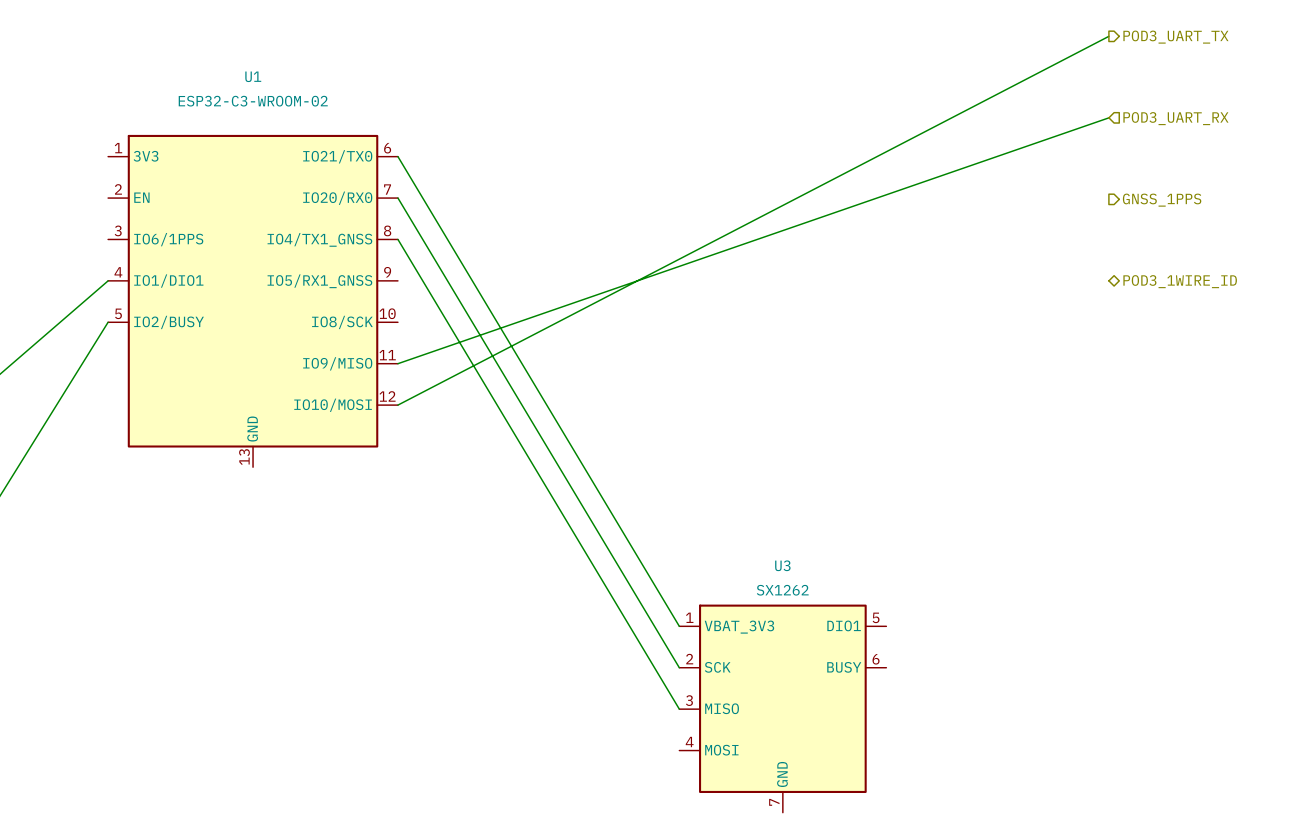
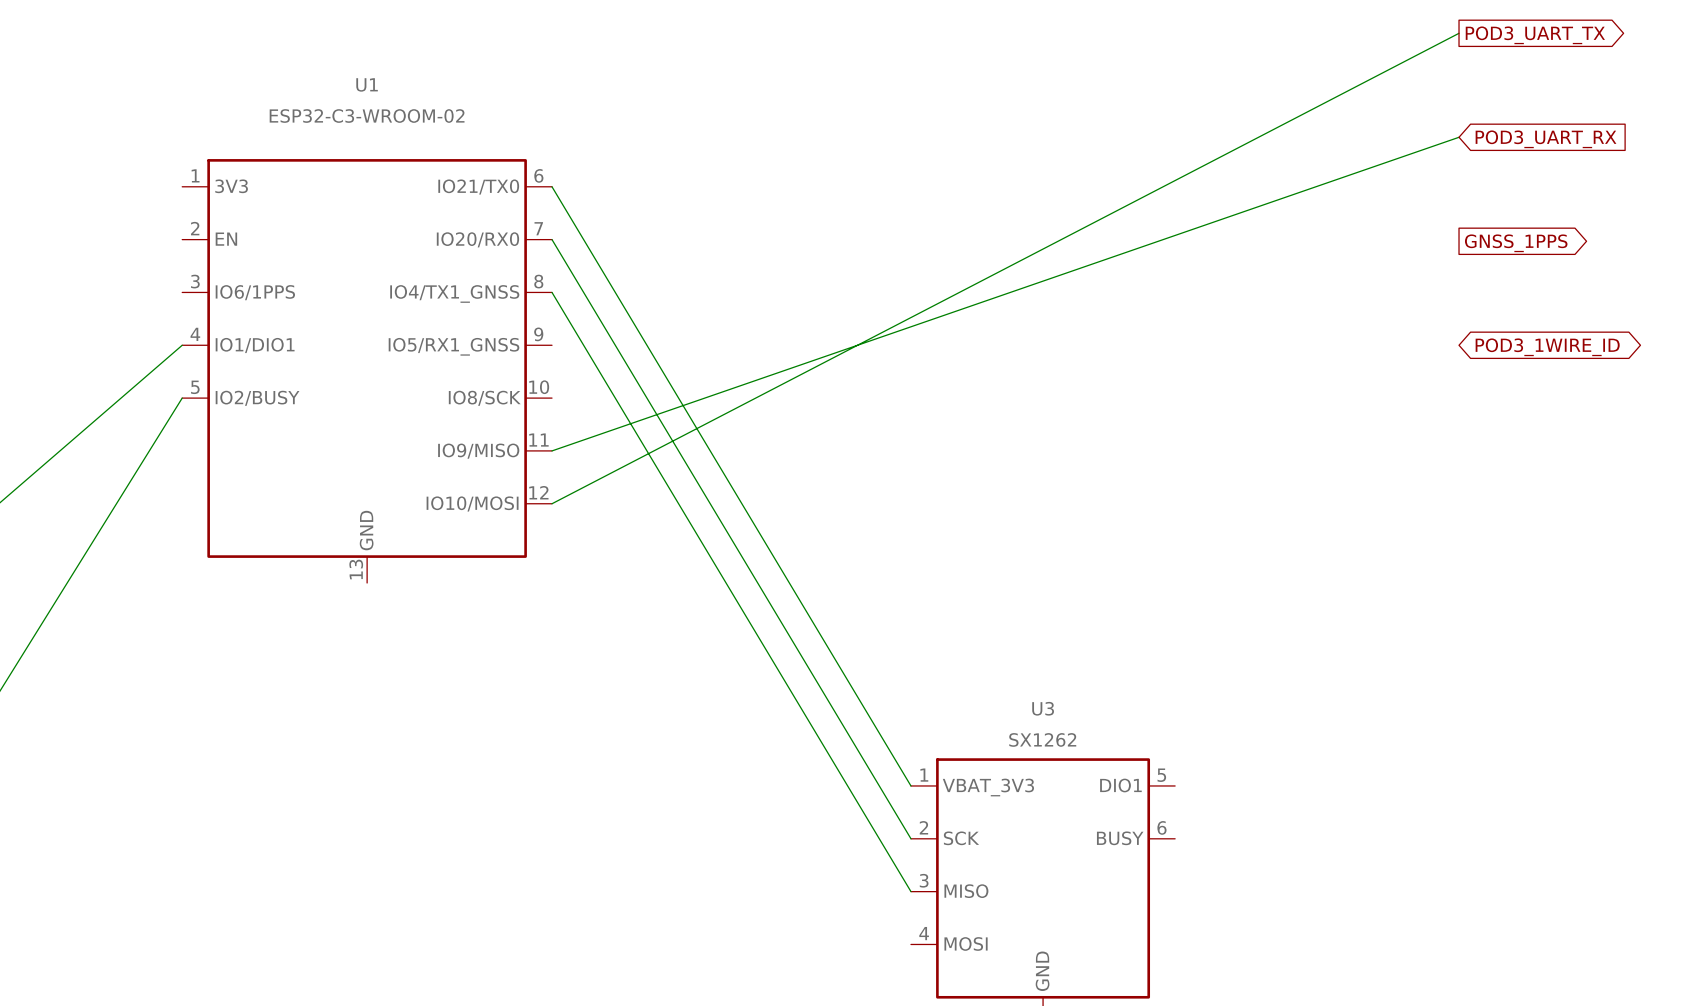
global label: none -> POD3_UART_TX (1535, 35)
hierarchical label: POD3_UART_TX (1175, 37) -> none
hierarchical label: POD3_UART_RX (1175, 118) -> none
global label: none -> POD3_UART_RX (1546, 139)
global label: none -> GNSS_1PPS (1516, 243)
hierarchical label: GNSS_1PPS (1162, 200) -> none
hierarchical label: POD3_1WIRE_ID (1180, 281) -> none
global label: none -> POD3_1WIRE_ID (1547, 347)

